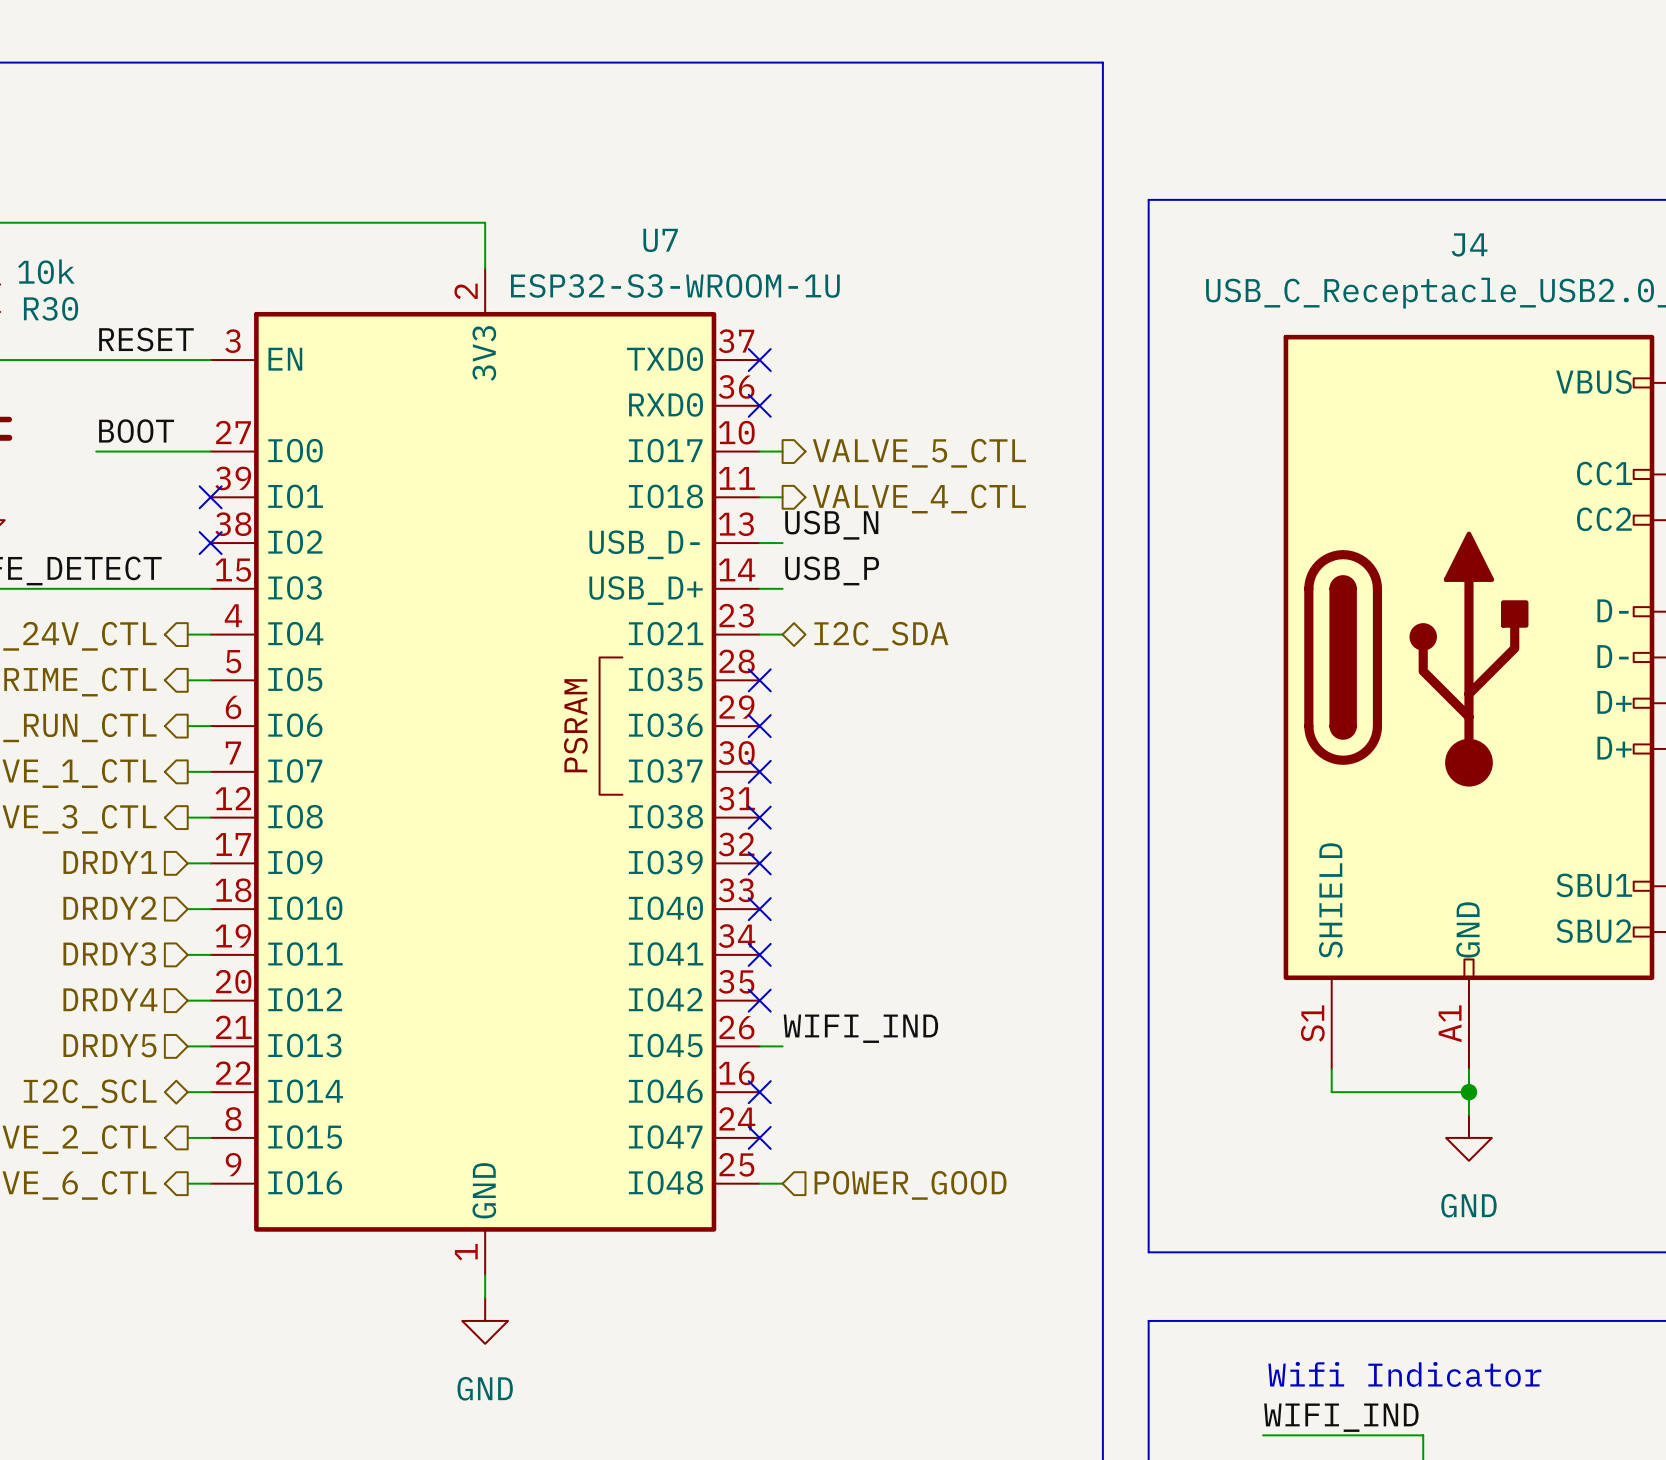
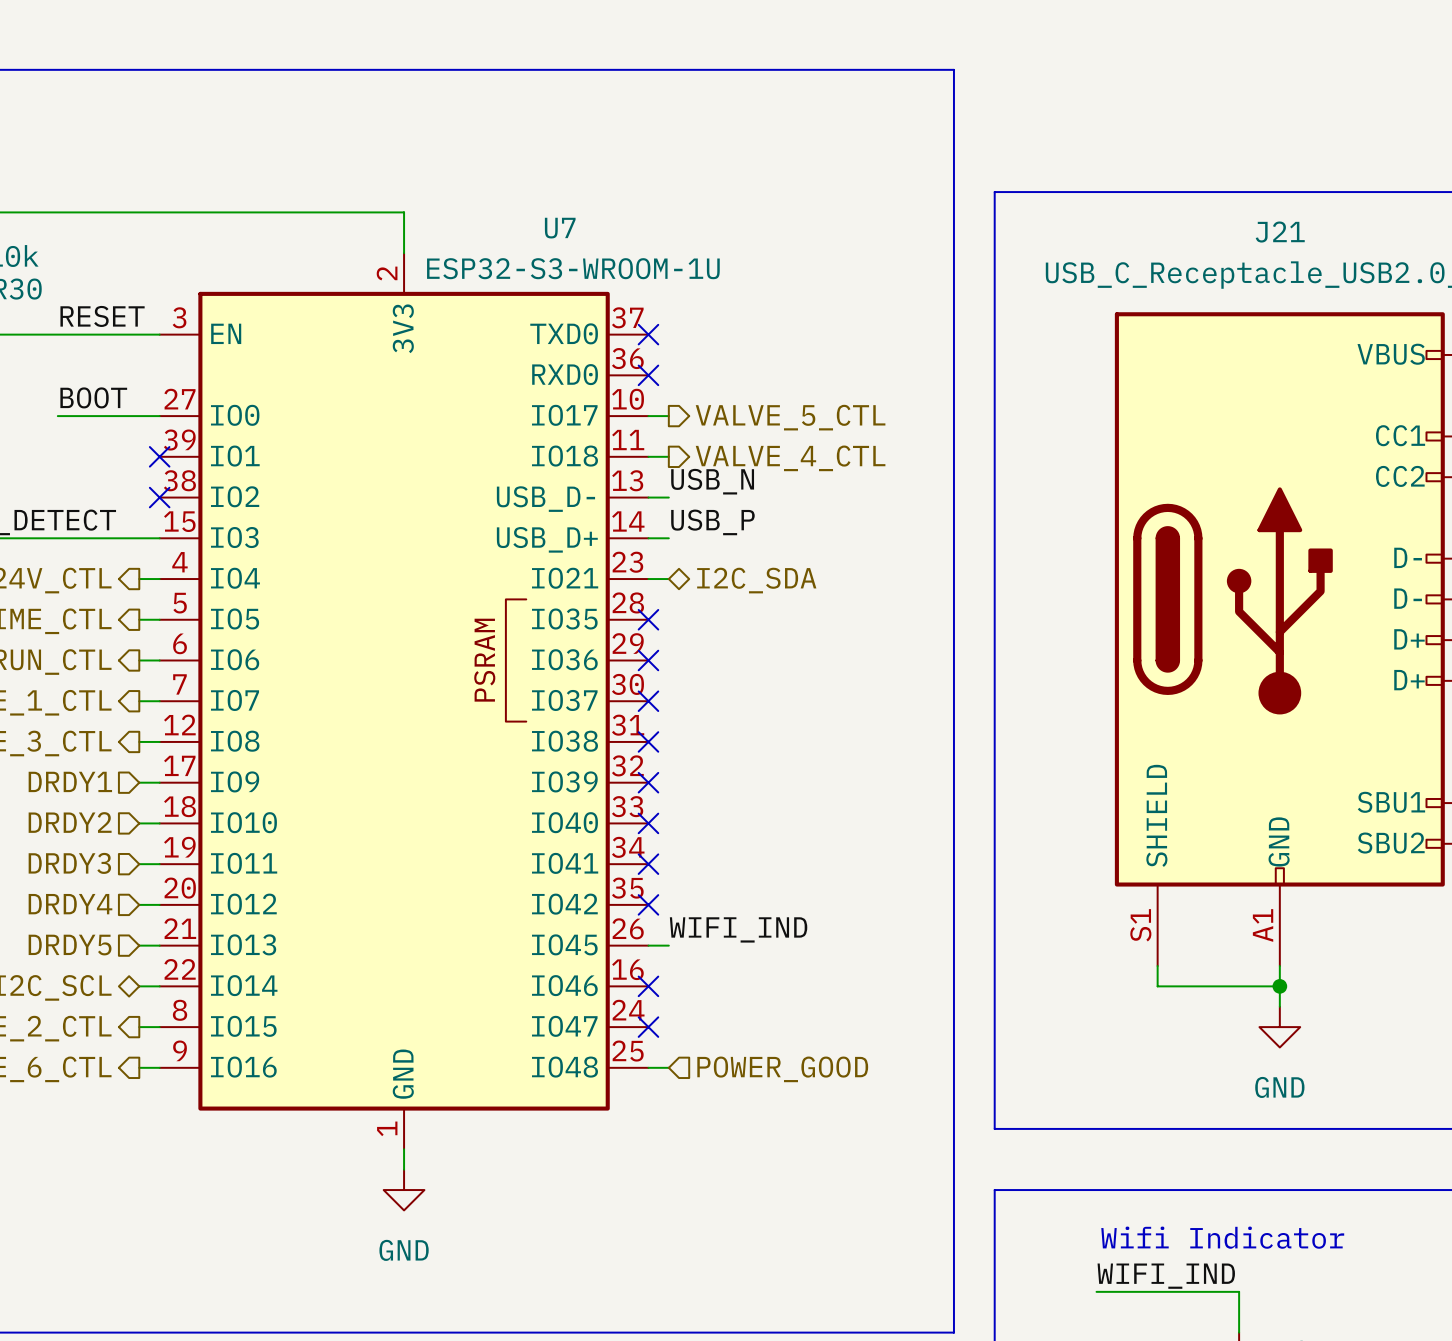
J4 name: J4 (1469, 244) -> J21 (1280, 232)

